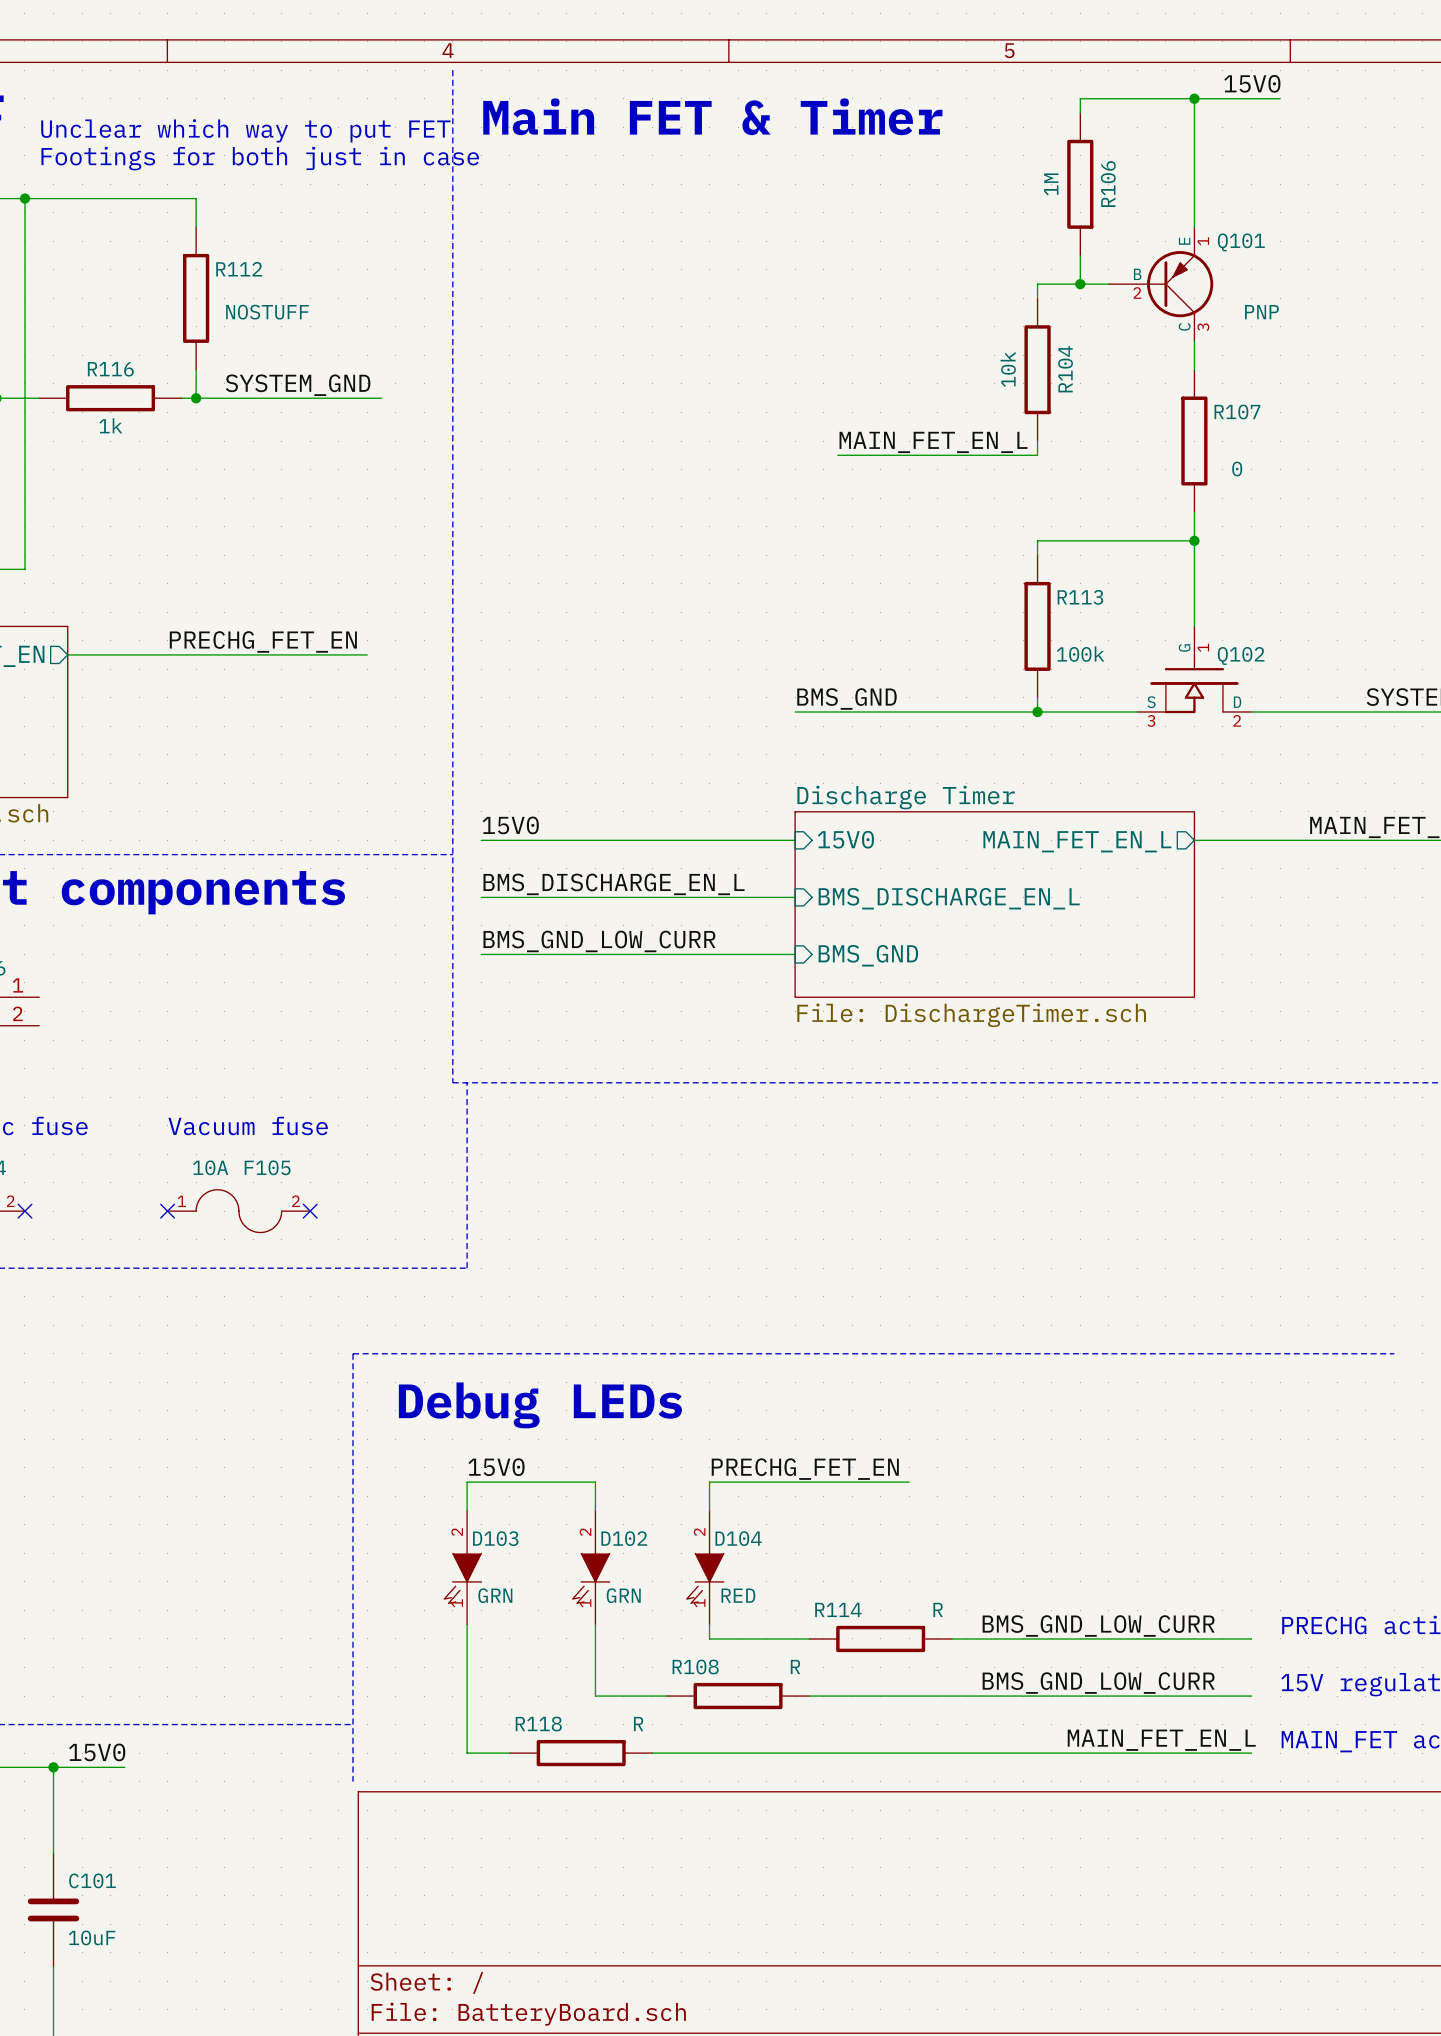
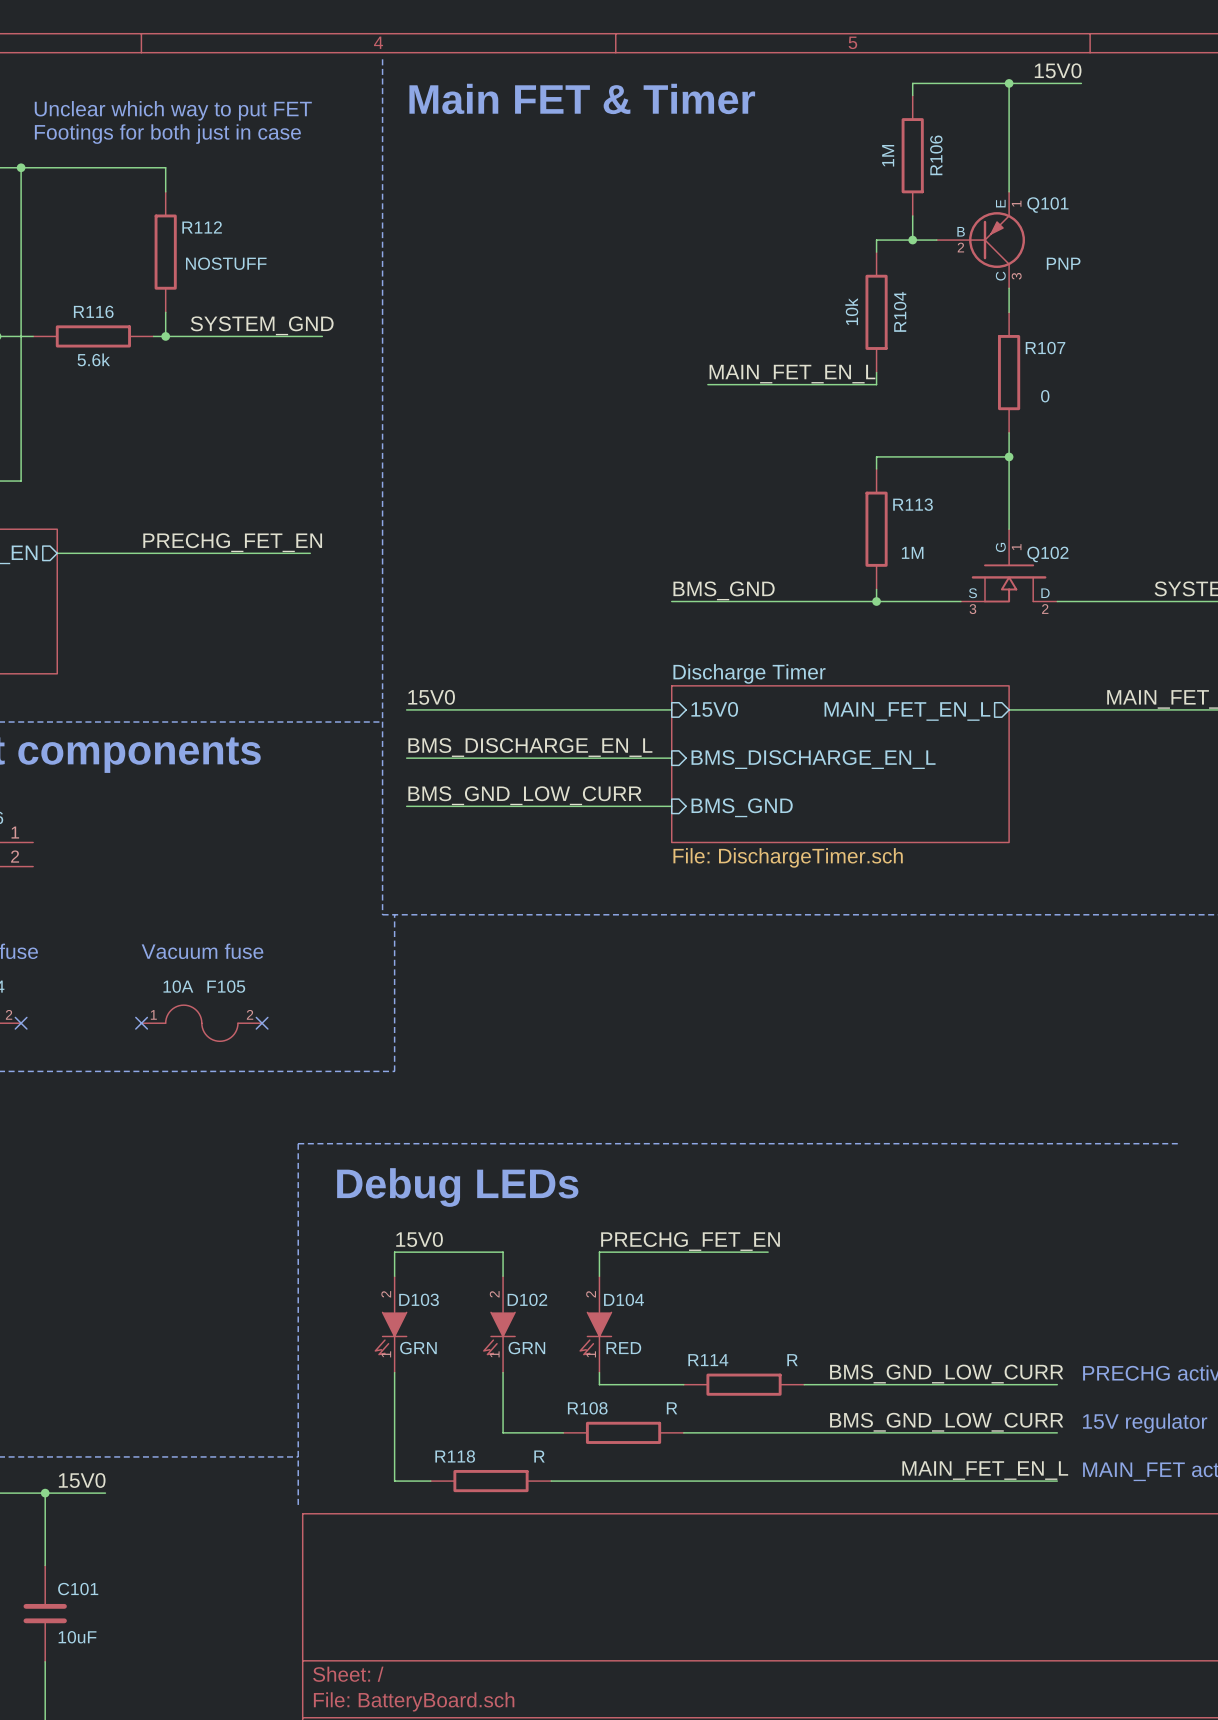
R116 value: 1k (110, 425) -> 5.6k (93, 359)
R113 value: 100k (1080, 654) -> 1M (912, 552)

